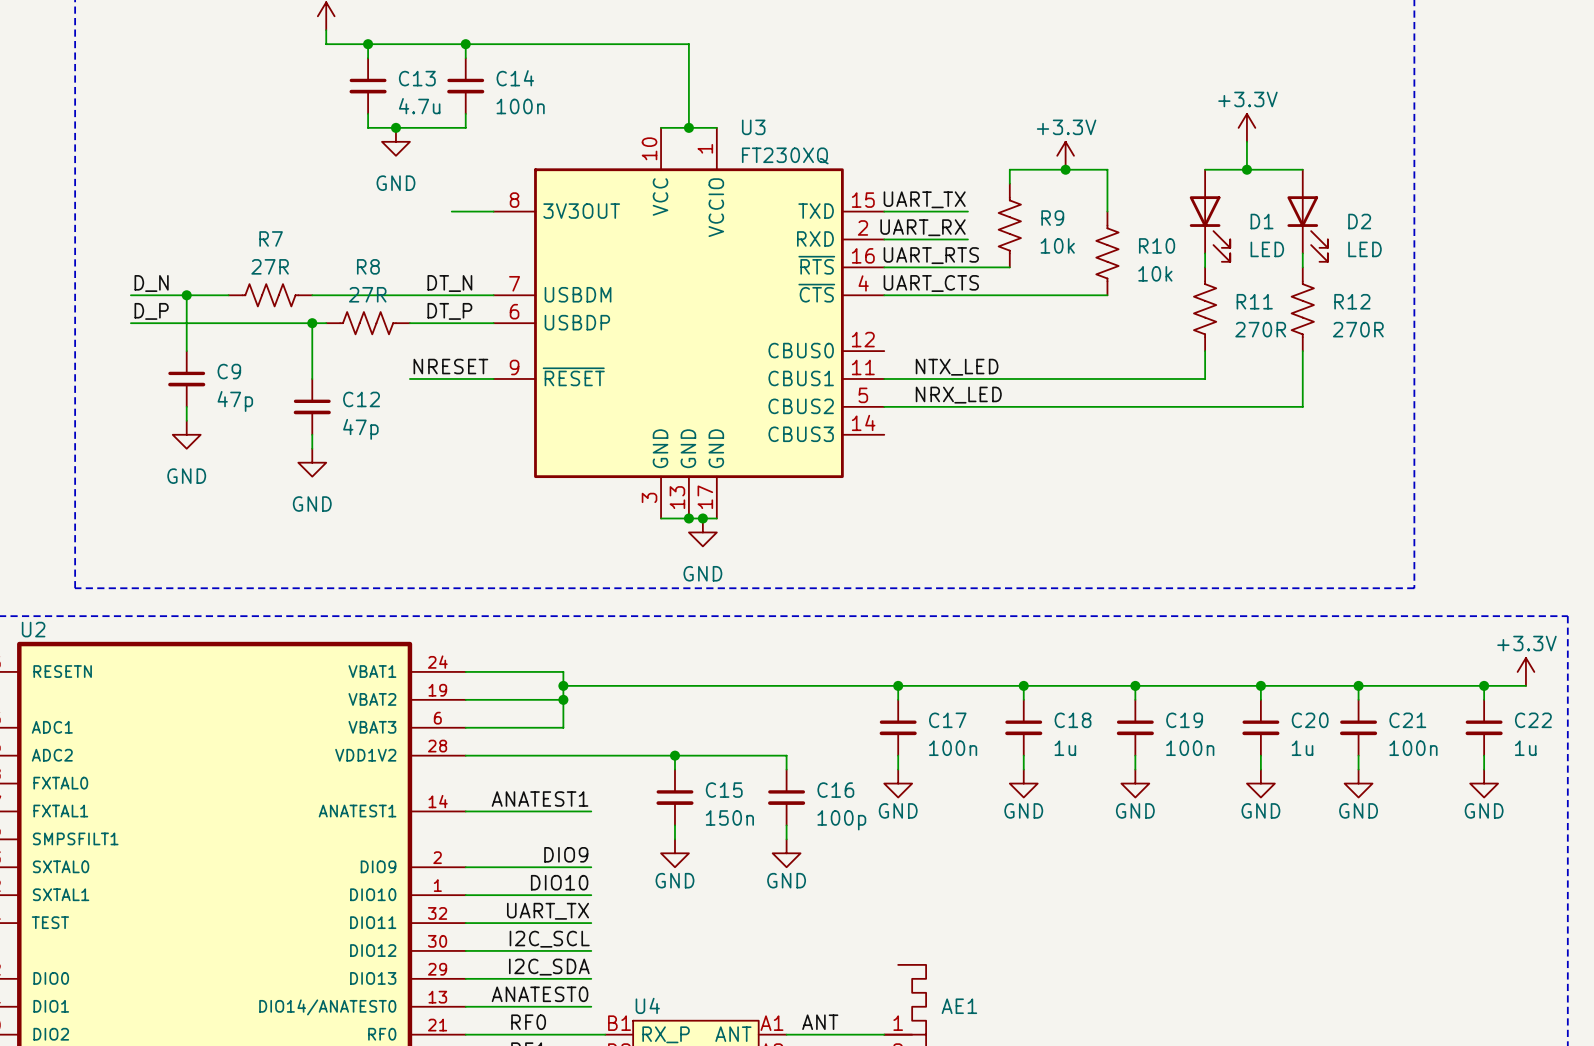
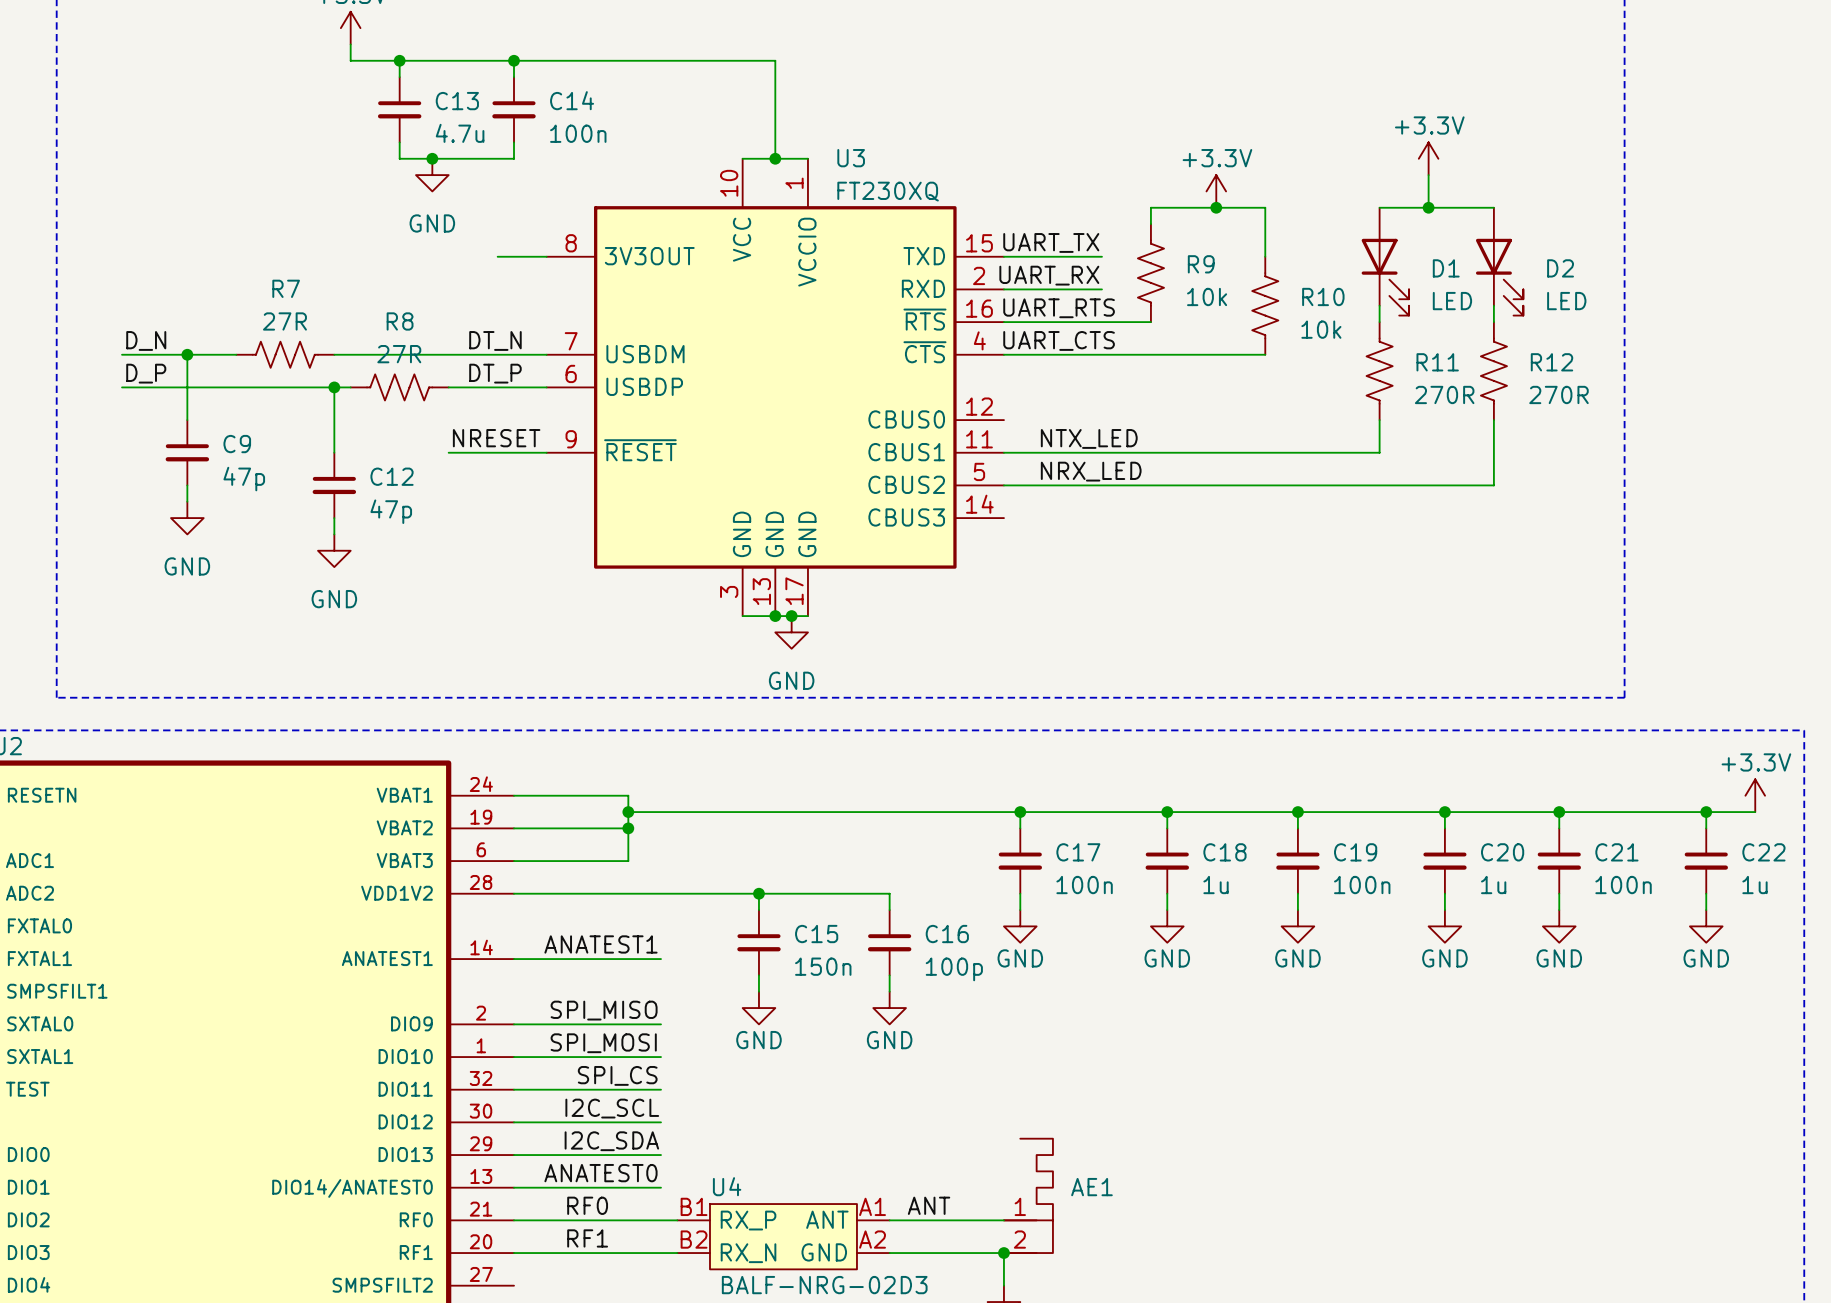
label: DIO9 (566, 854) -> SPI_MISO (604, 1010)
label: DIO10 (559, 882) -> SPI_MOSI (603, 1043)
label: UART_TX (548, 911) -> SPI_CS (617, 1075)

